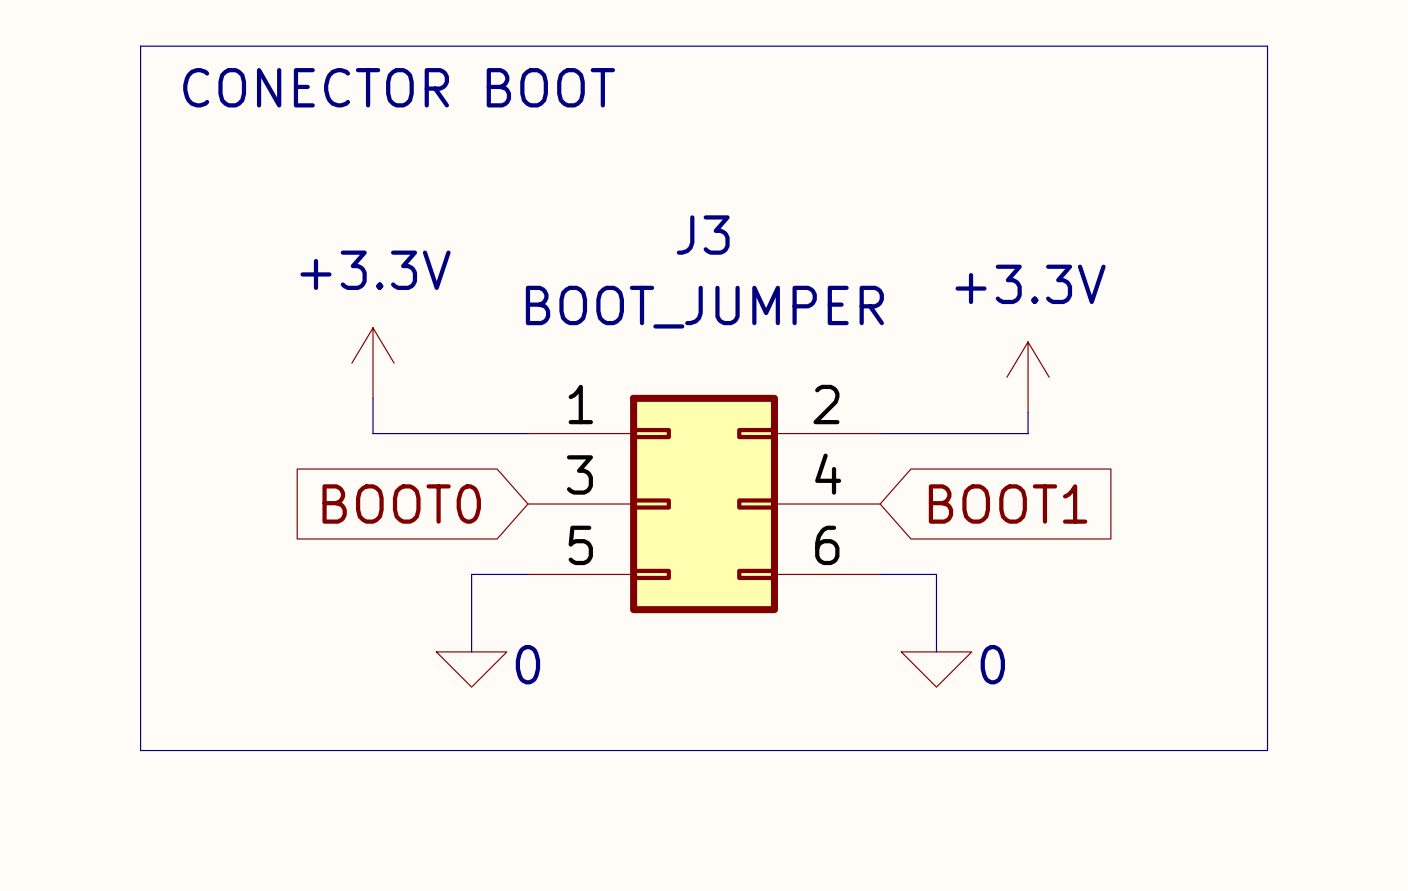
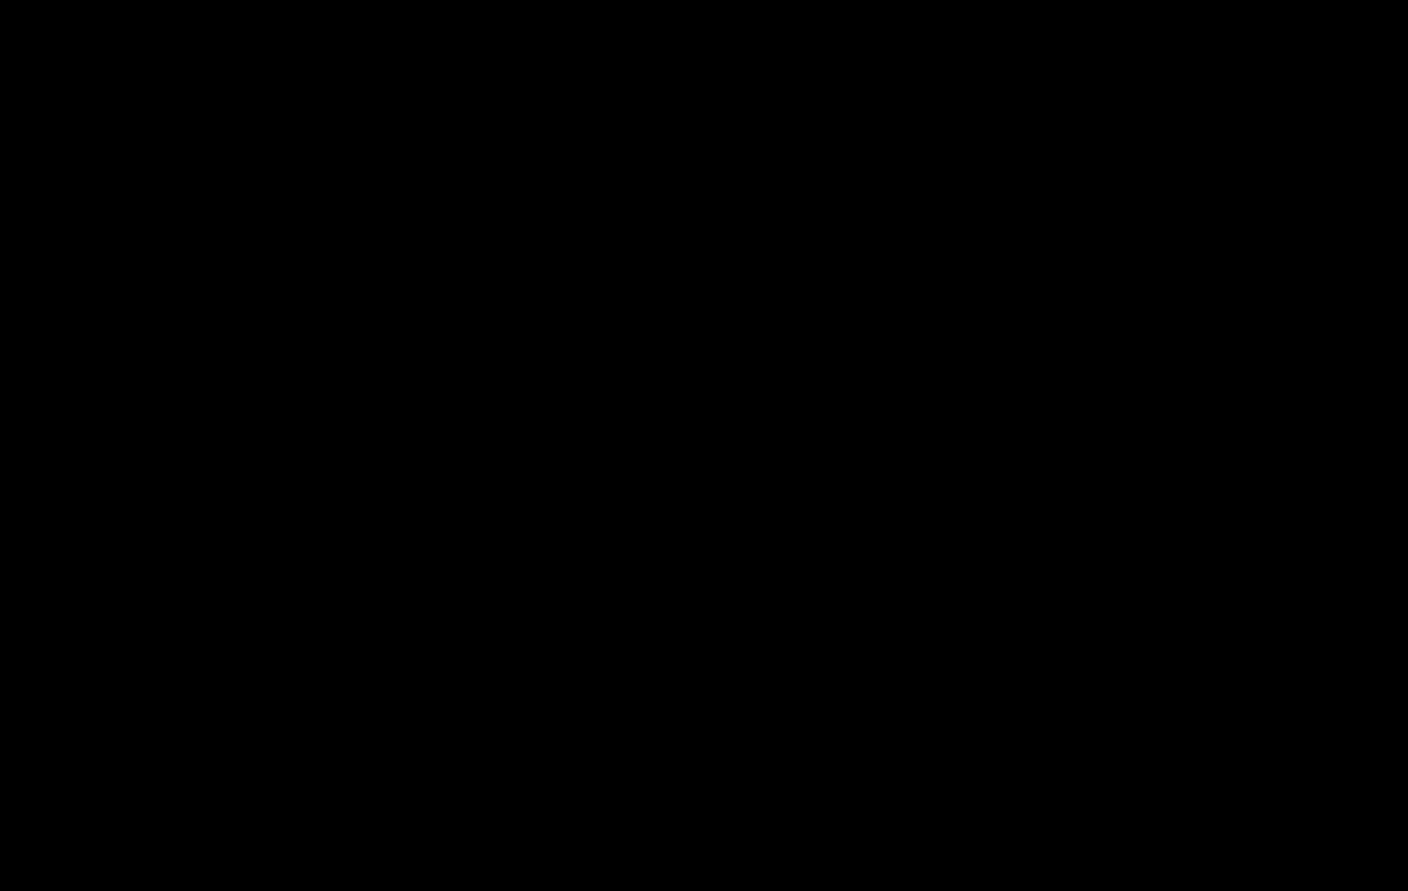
line: (140, 46) (1267, 46) (1267, 750) (140, 750) (140, 46) -> none
text: CONECTOR BOOT (399, 87) -> none
power symbol: +3.3V (373, 363) -> none
power symbol: +3.3V (1028, 377) -> none
wire: (373, 398) (373, 433) (527, 433) -> none
wire: (1028, 412) (1028, 433) (880, 433) -> none
global label: BOOT0 (401, 504) -> none
J3: BOOT_JUMPER (704, 504) -> none
global label: BOOT1 (1008, 504) -> none
wire: (527, 574) (471, 574) (471, 651) -> none
wire: (880, 574) (936, 574) (936, 651) -> none
power symbol: 0 (471, 669) -> none
power symbol: 0 (936, 669) -> none

